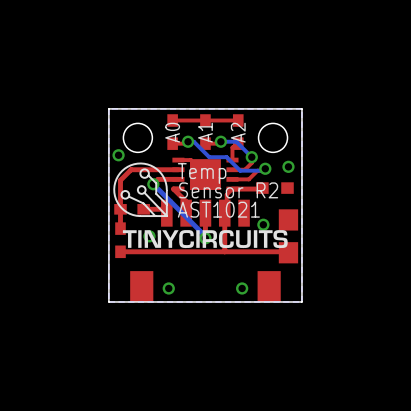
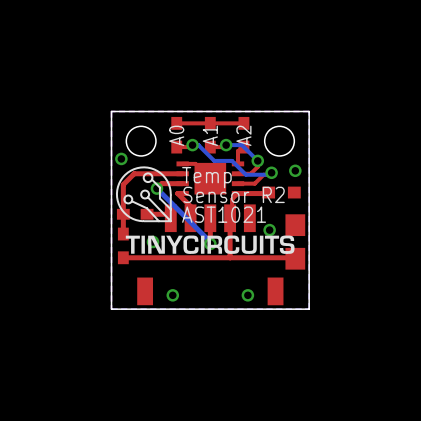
part footprint: [130, 199, 281, 302] -> [137, 204, 284, 306]

